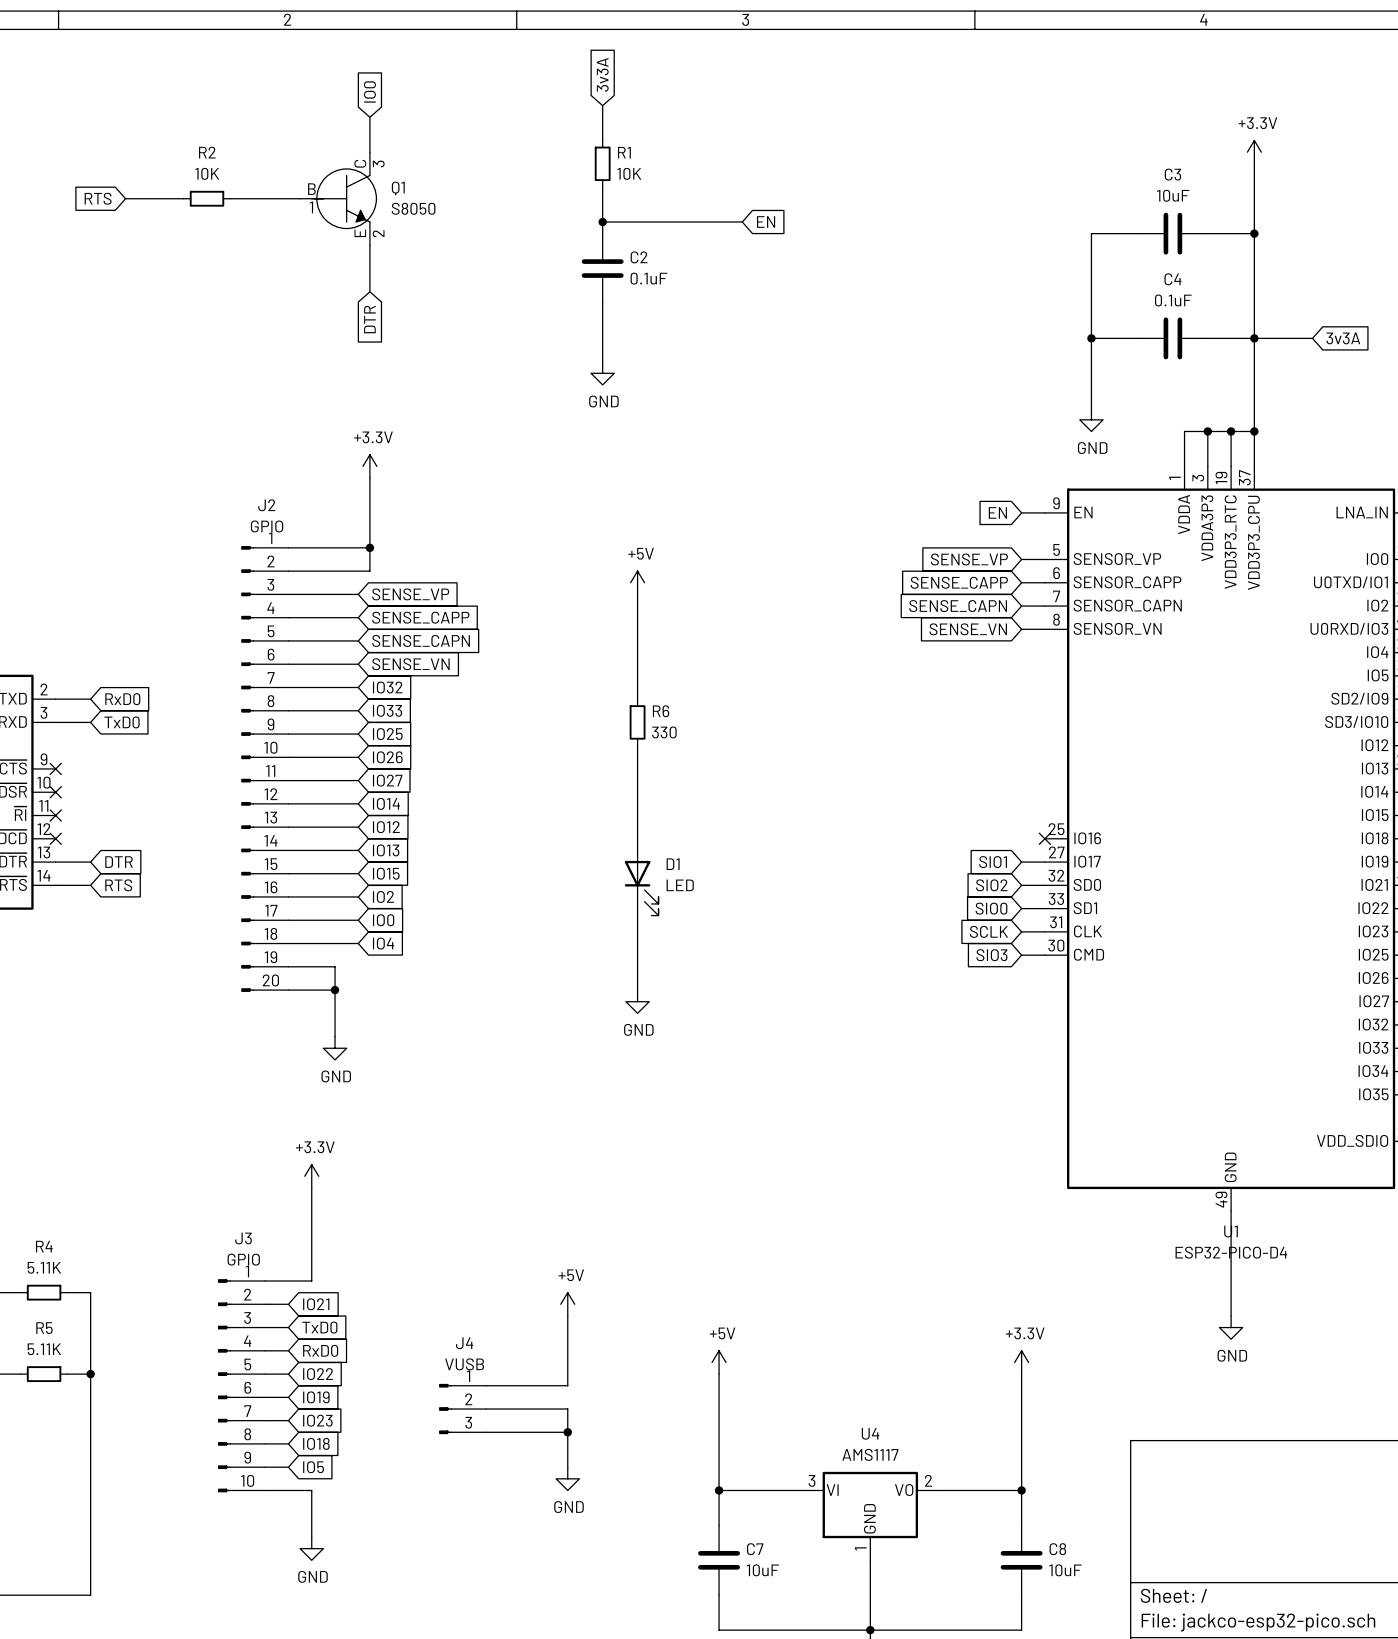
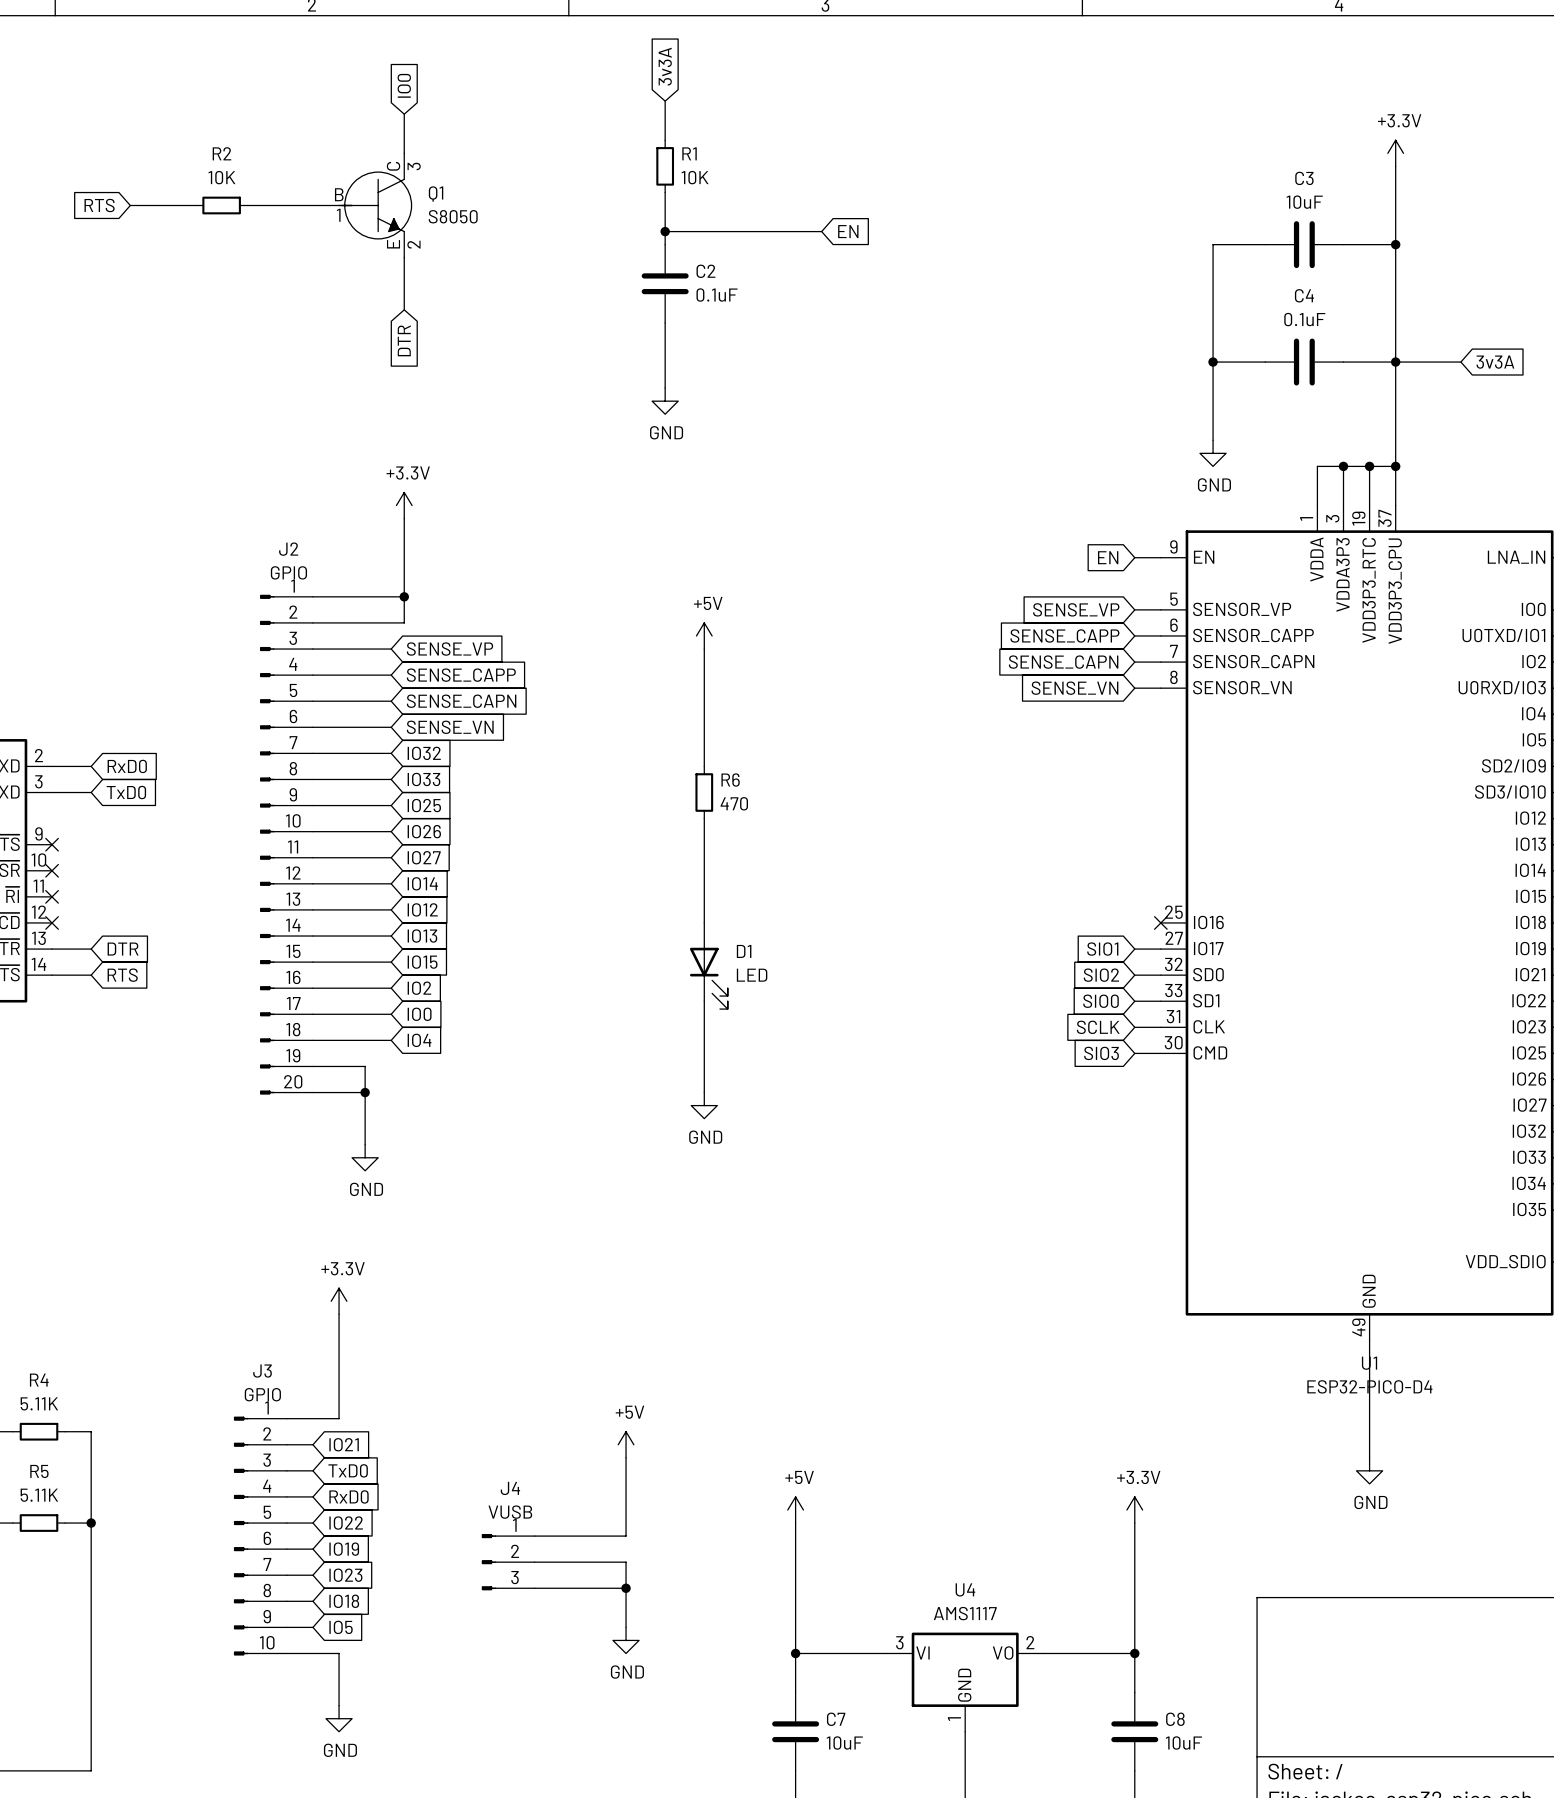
R6 value: 330 (664, 732) -> 470 (734, 803)

